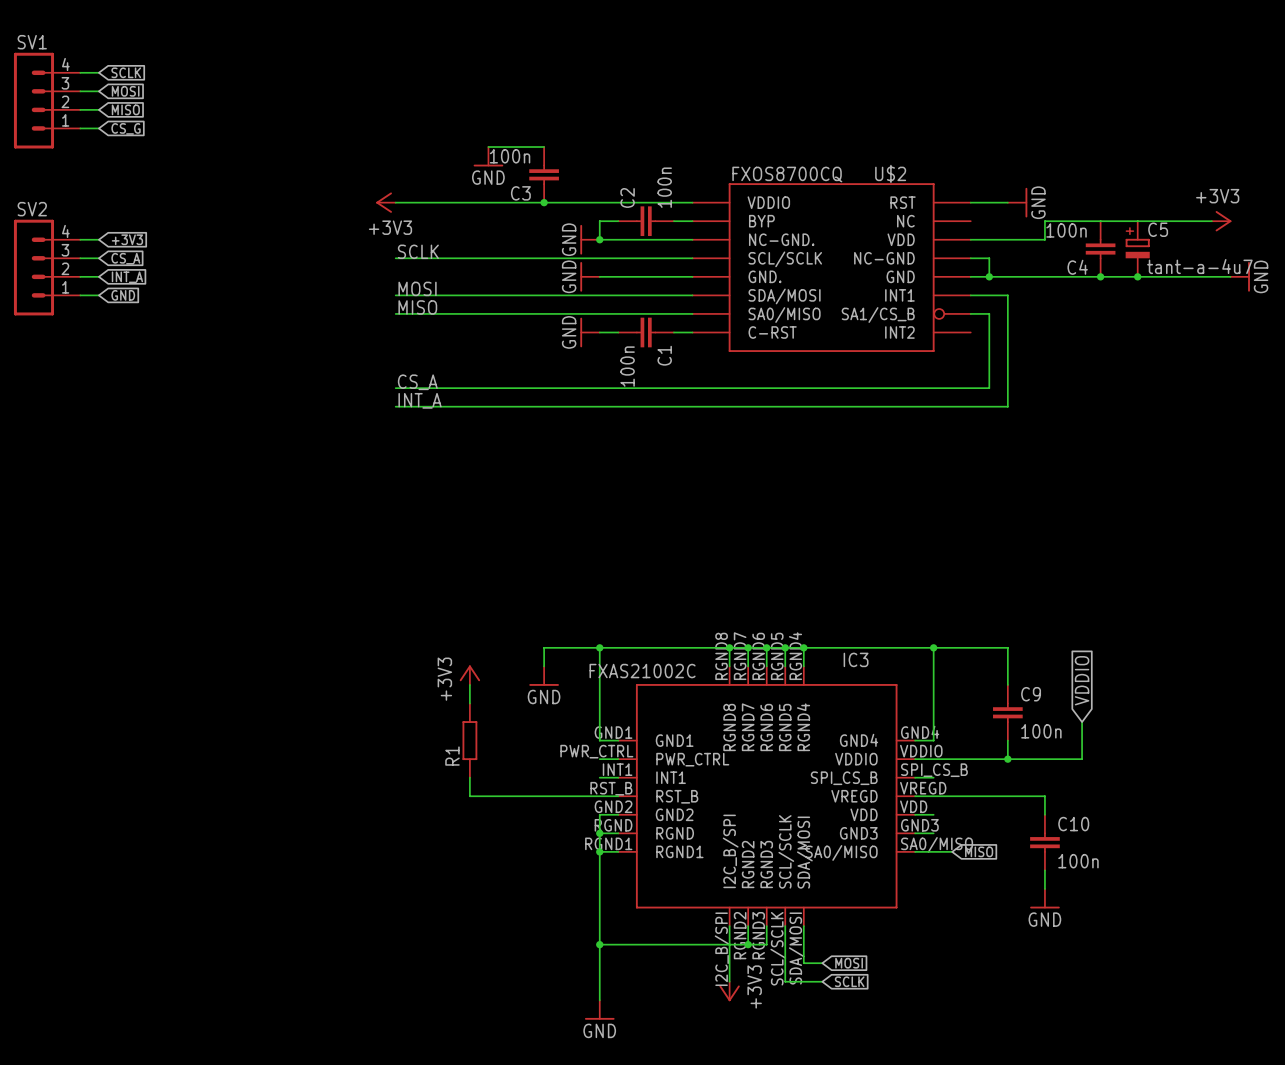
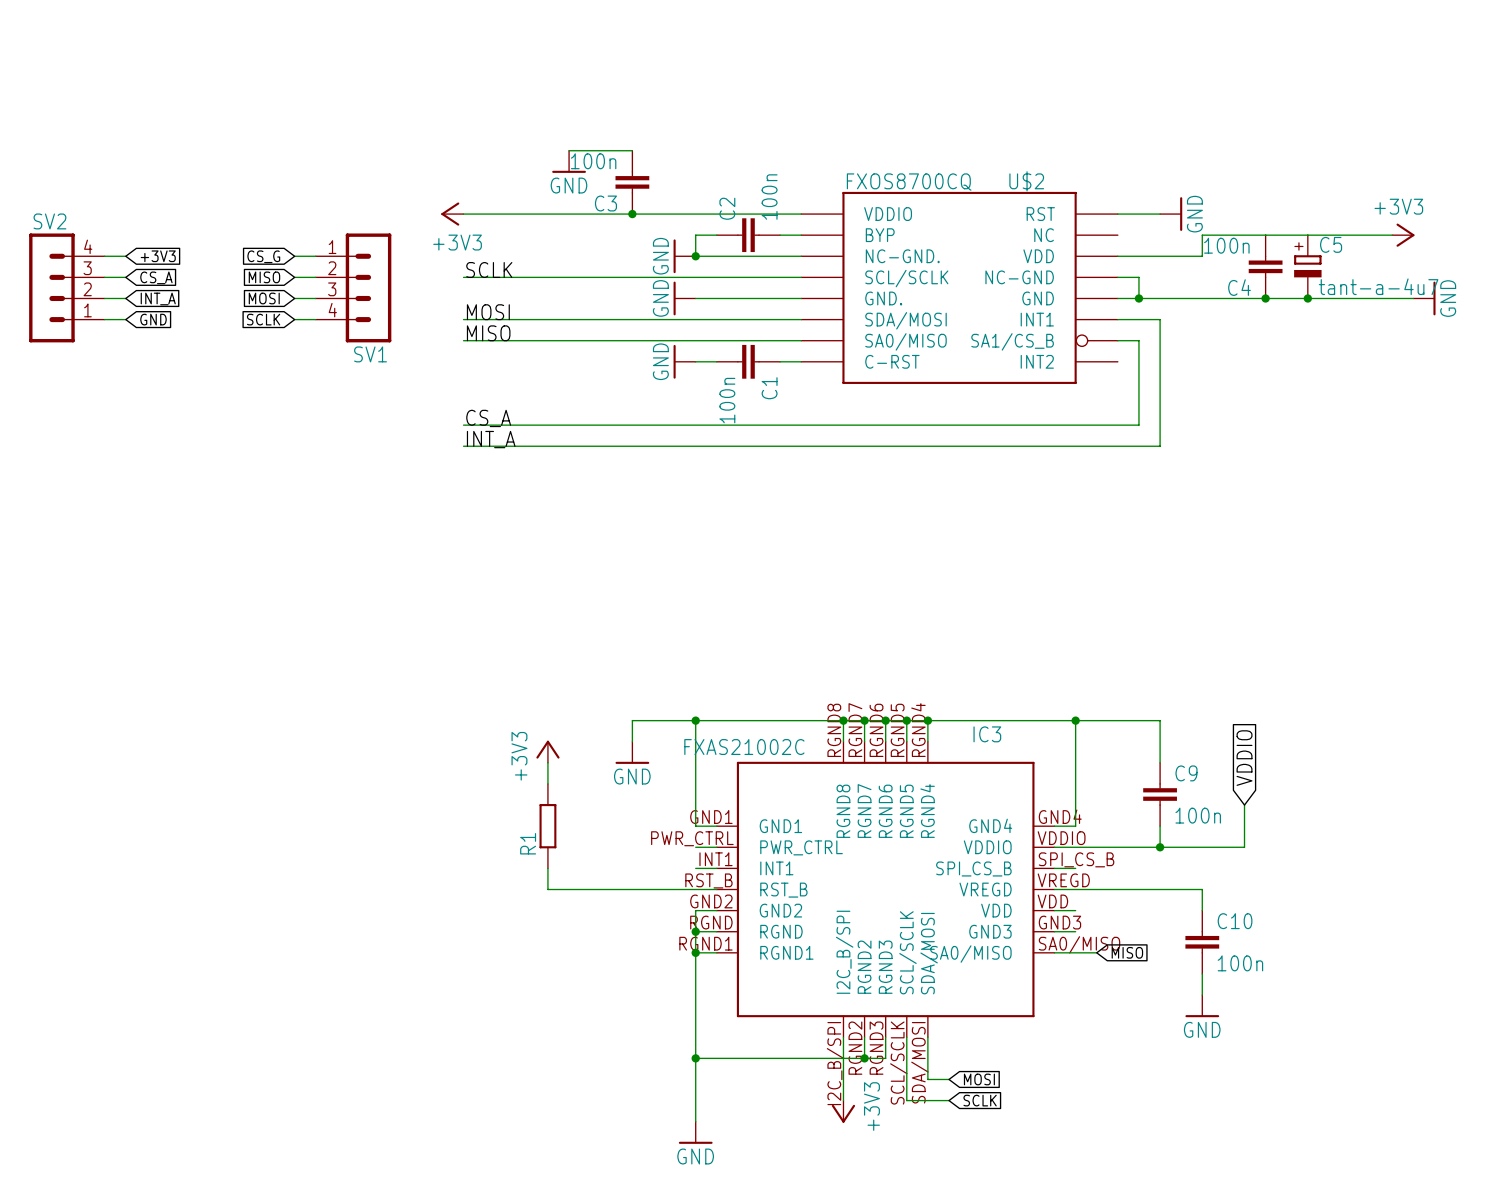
wire: (80, 72) (98, 72) -> none
global label: SCLK (126, 72) -> none
wire: (80, 91) (98, 91) -> none
global label: MOSI (125, 91) -> none
SV1 rotation: 0° (33, 100) -> 180° (368, 287)
SV1 position: (47, 100) -> (353, 287)
wire: (80, 109) (98, 109) -> none
global label: MISO (125, 109) -> none
wire: (80, 128) (98, 128) -> none
global label: CS_G (126, 128) -> none
wire: none -> (294, 256) (315, 256)
global label: none -> CS_G (263, 256)
global label: none -> MISO (264, 277)
wire: none -> (294, 277) (315, 277)
global label: none -> MOSI (264, 298)
wire: none -> (294, 298) (315, 298)
global label: none -> SCLK (263, 319)
wire: none -> (294, 319) (315, 319)

